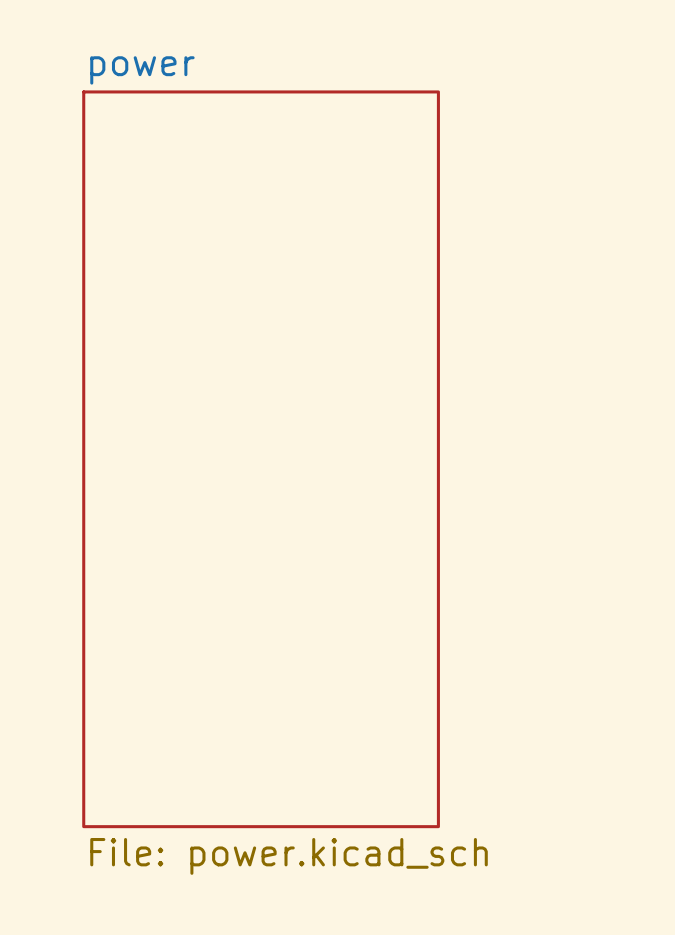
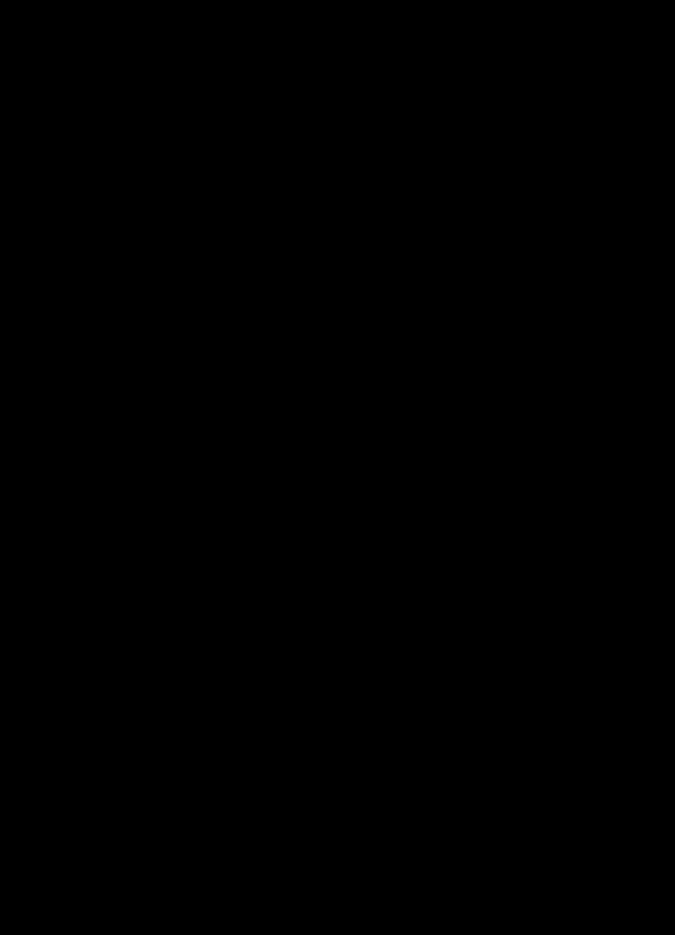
sheet power: File: power.kicad_sch (261, 459) -> none

